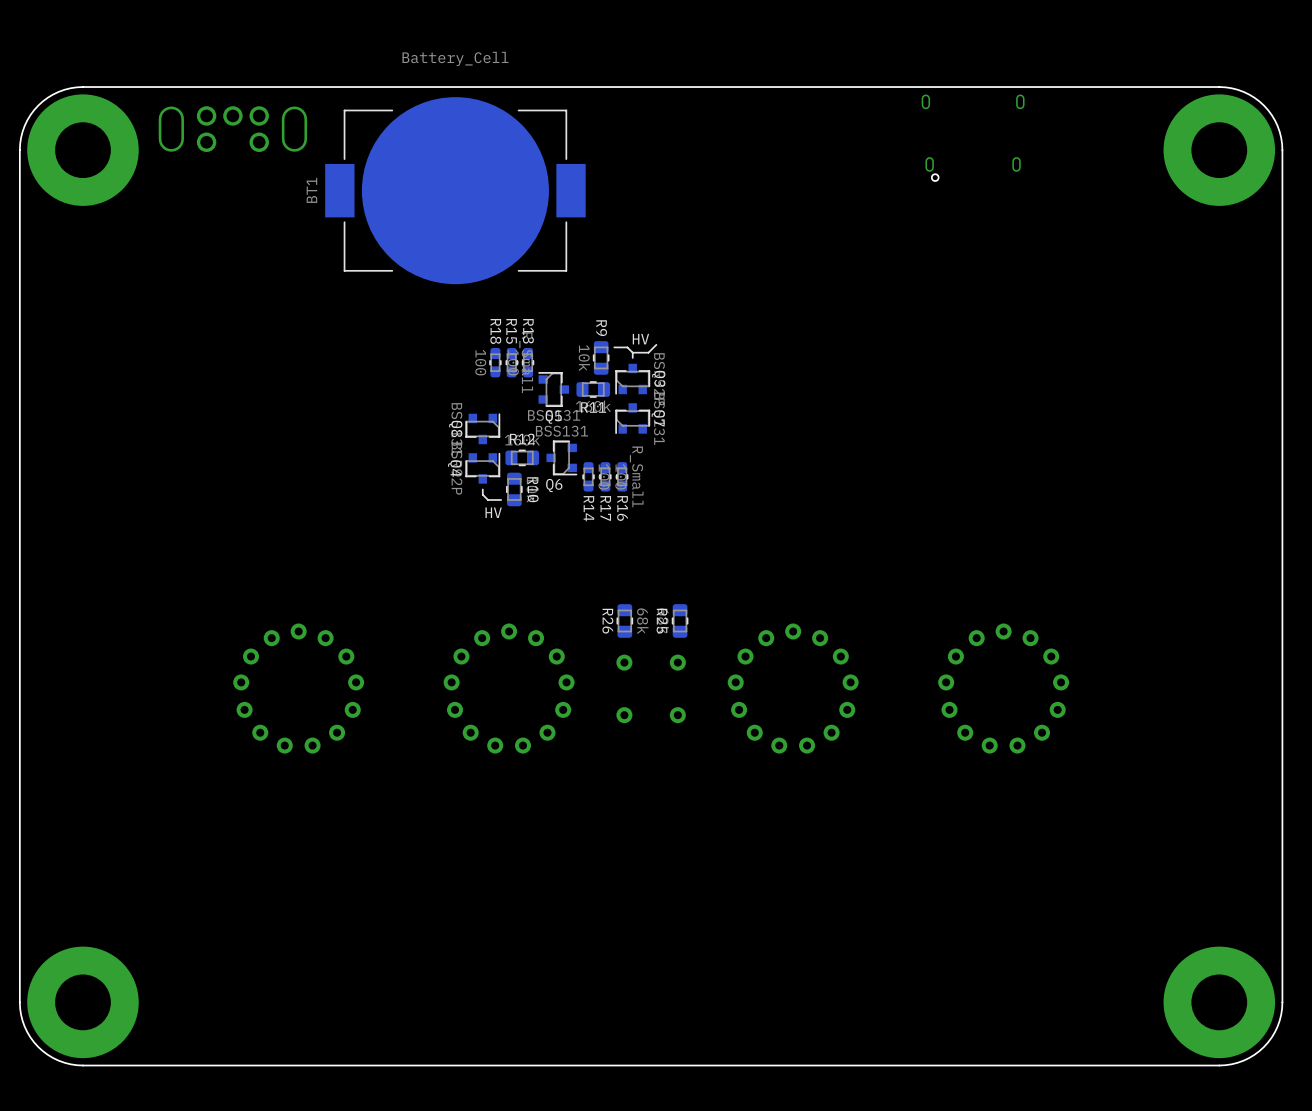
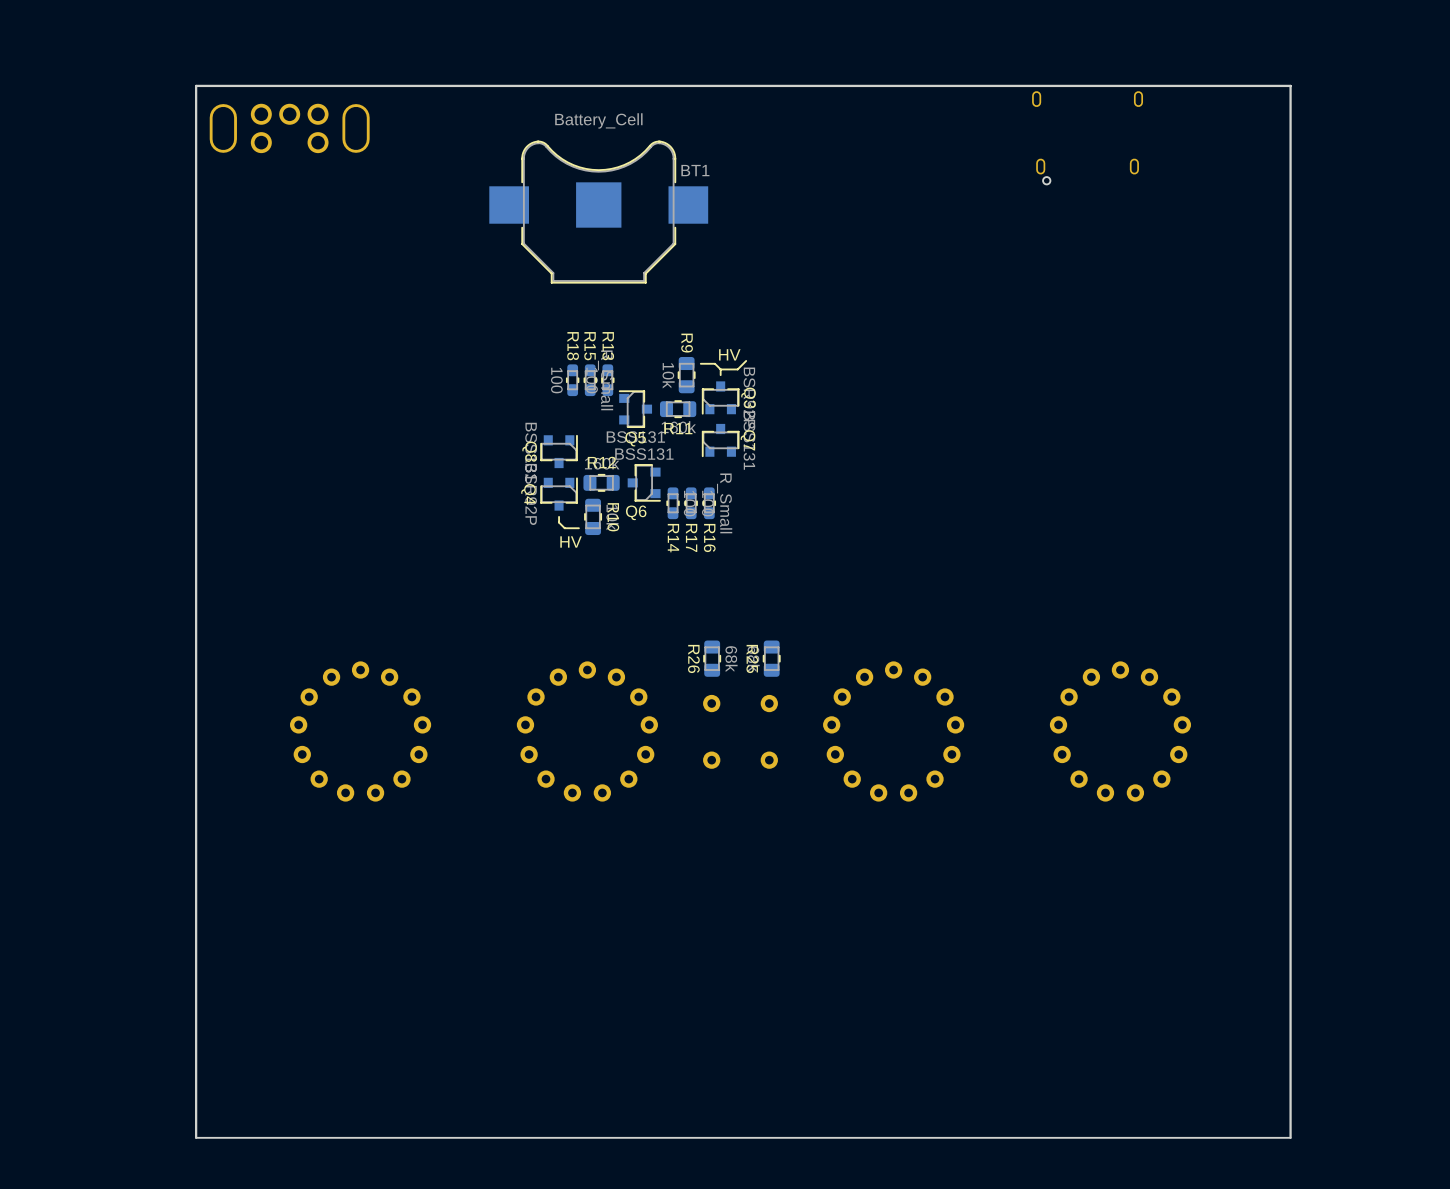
BT1 value position: Battery_Cell (455, 58) -> Battery_Cell (598, 120)
BT1 footprint: [325, 97, 586, 285] -> [489, 140, 709, 284]
part: (82, 150) -> none
part: (1219, 150) -> none
BT1 name position: BT1 (311, 190) -> BT1 (695, 170)
part: (82, 1002) -> none
part: (1219, 1002) -> none
board edge: (1161, 1065) (1225, 1065) (1243, 1060) (1259, 1051) (1268, 1042) (1277, 1026) (1282, 1008) (1282, 150) (1277, 125) (1268, 110) (1259, 101) (1243, 91) (1219, 87) (76, 87) (58, 91) (38, 105) (24, 125) (20, 143) (20, 1008) (24, 1026) (34, 1042) (42, 1051) (58, 1060) (76, 1065) (146, 1065) -> (1290, 1137) (1290, 85) (196, 85) (196, 1137)

